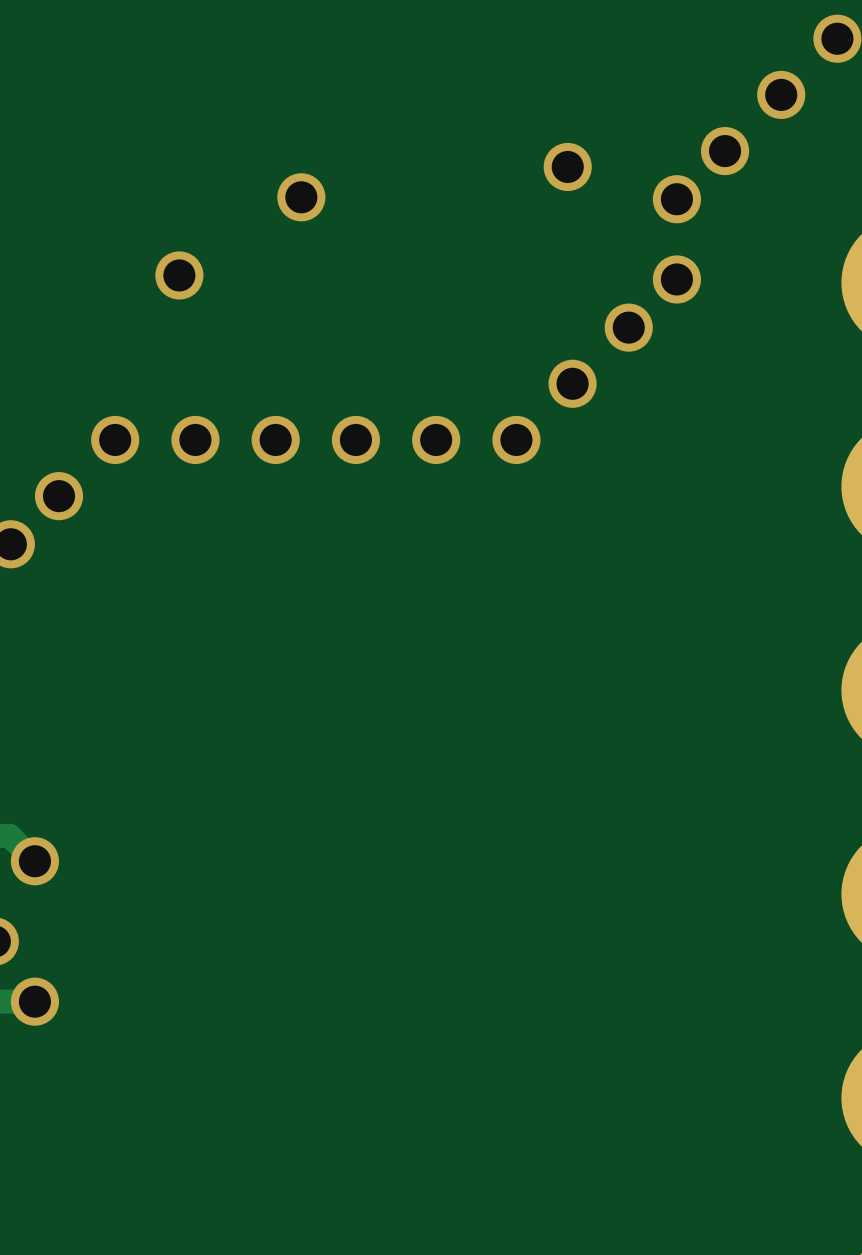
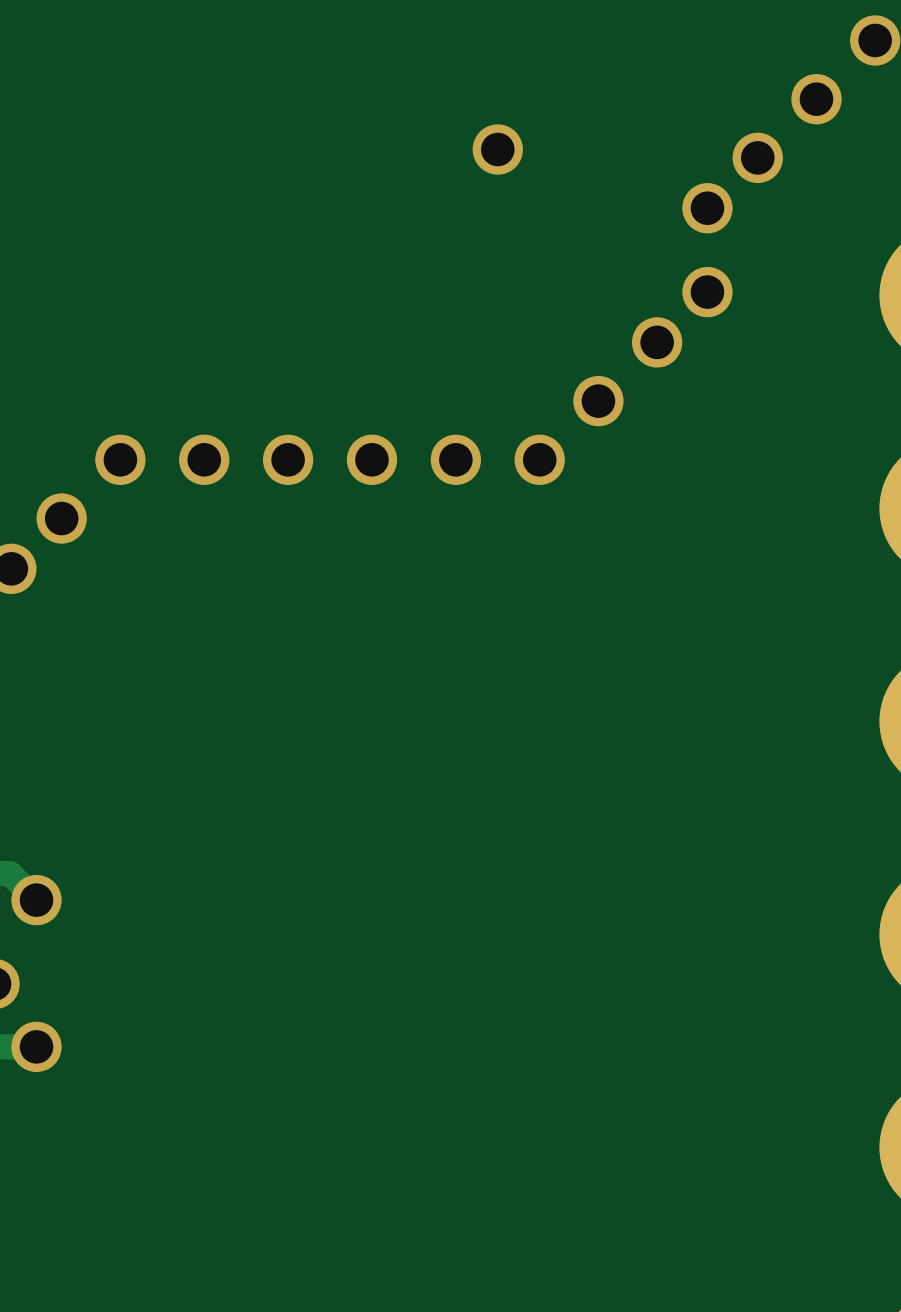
via: none -> (497, 149)
via: (567, 166) -> none
via: (301, 197) -> none
via: (179, 275) -> none

